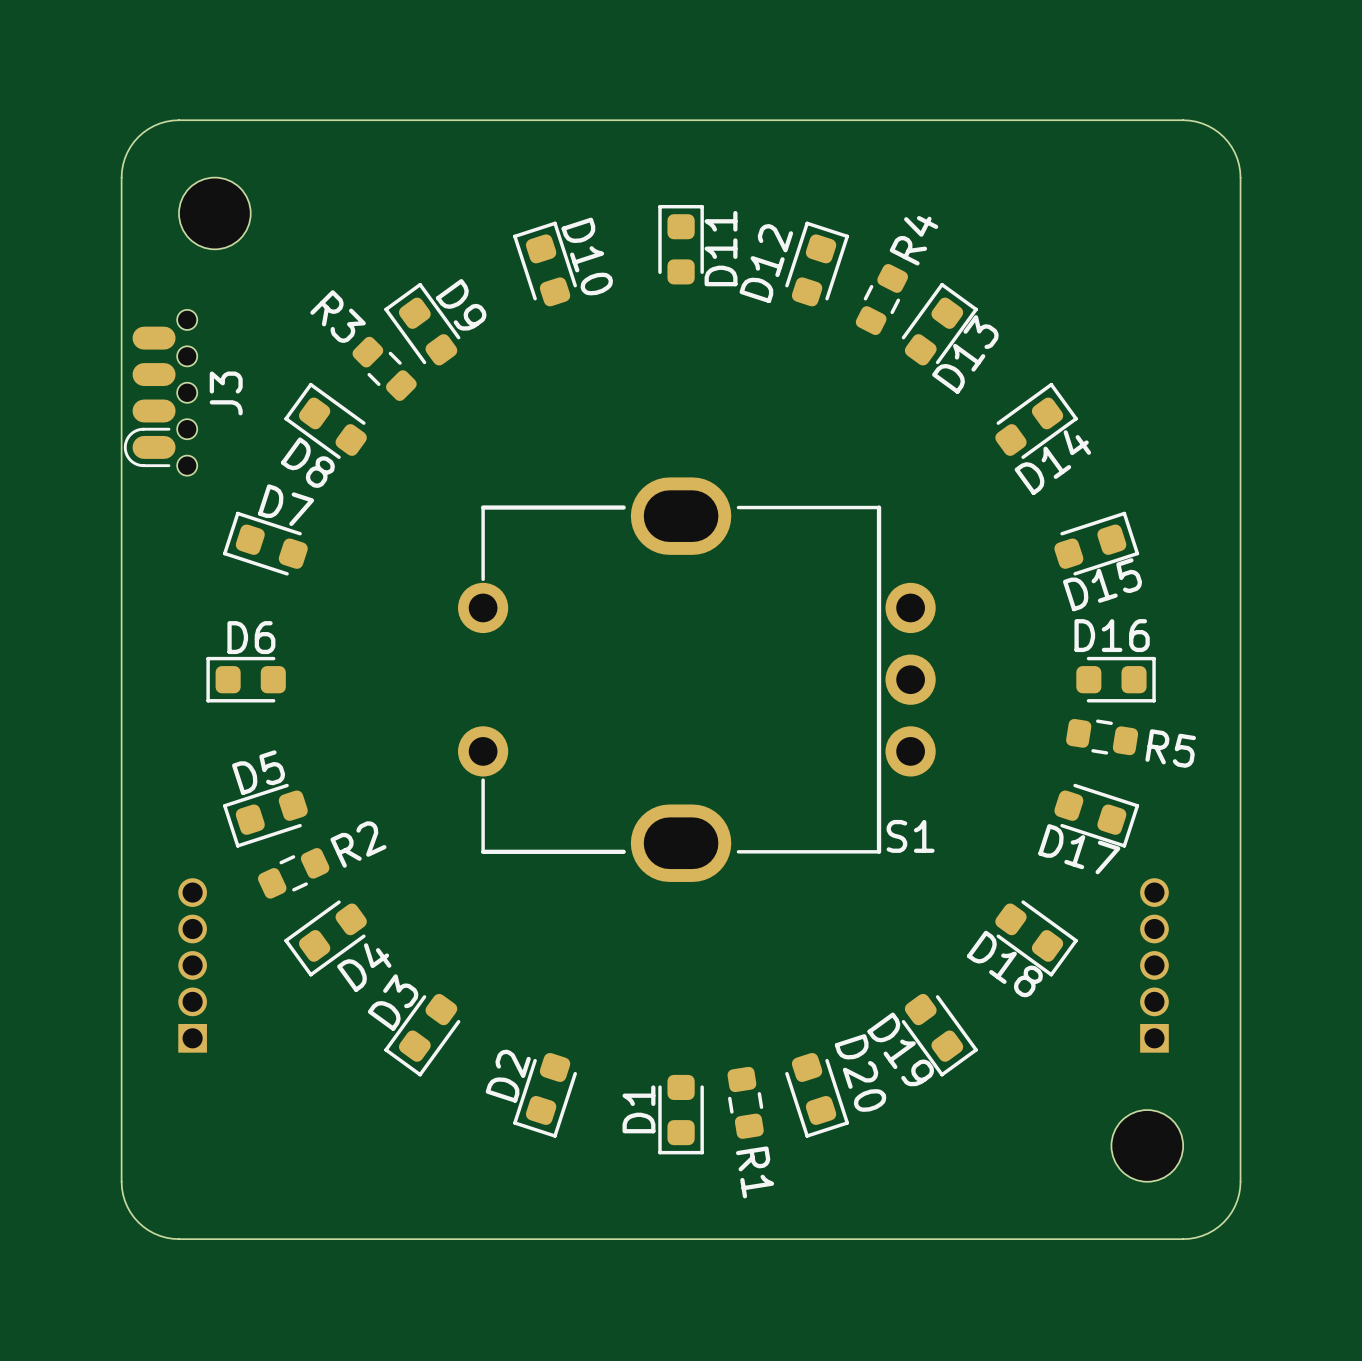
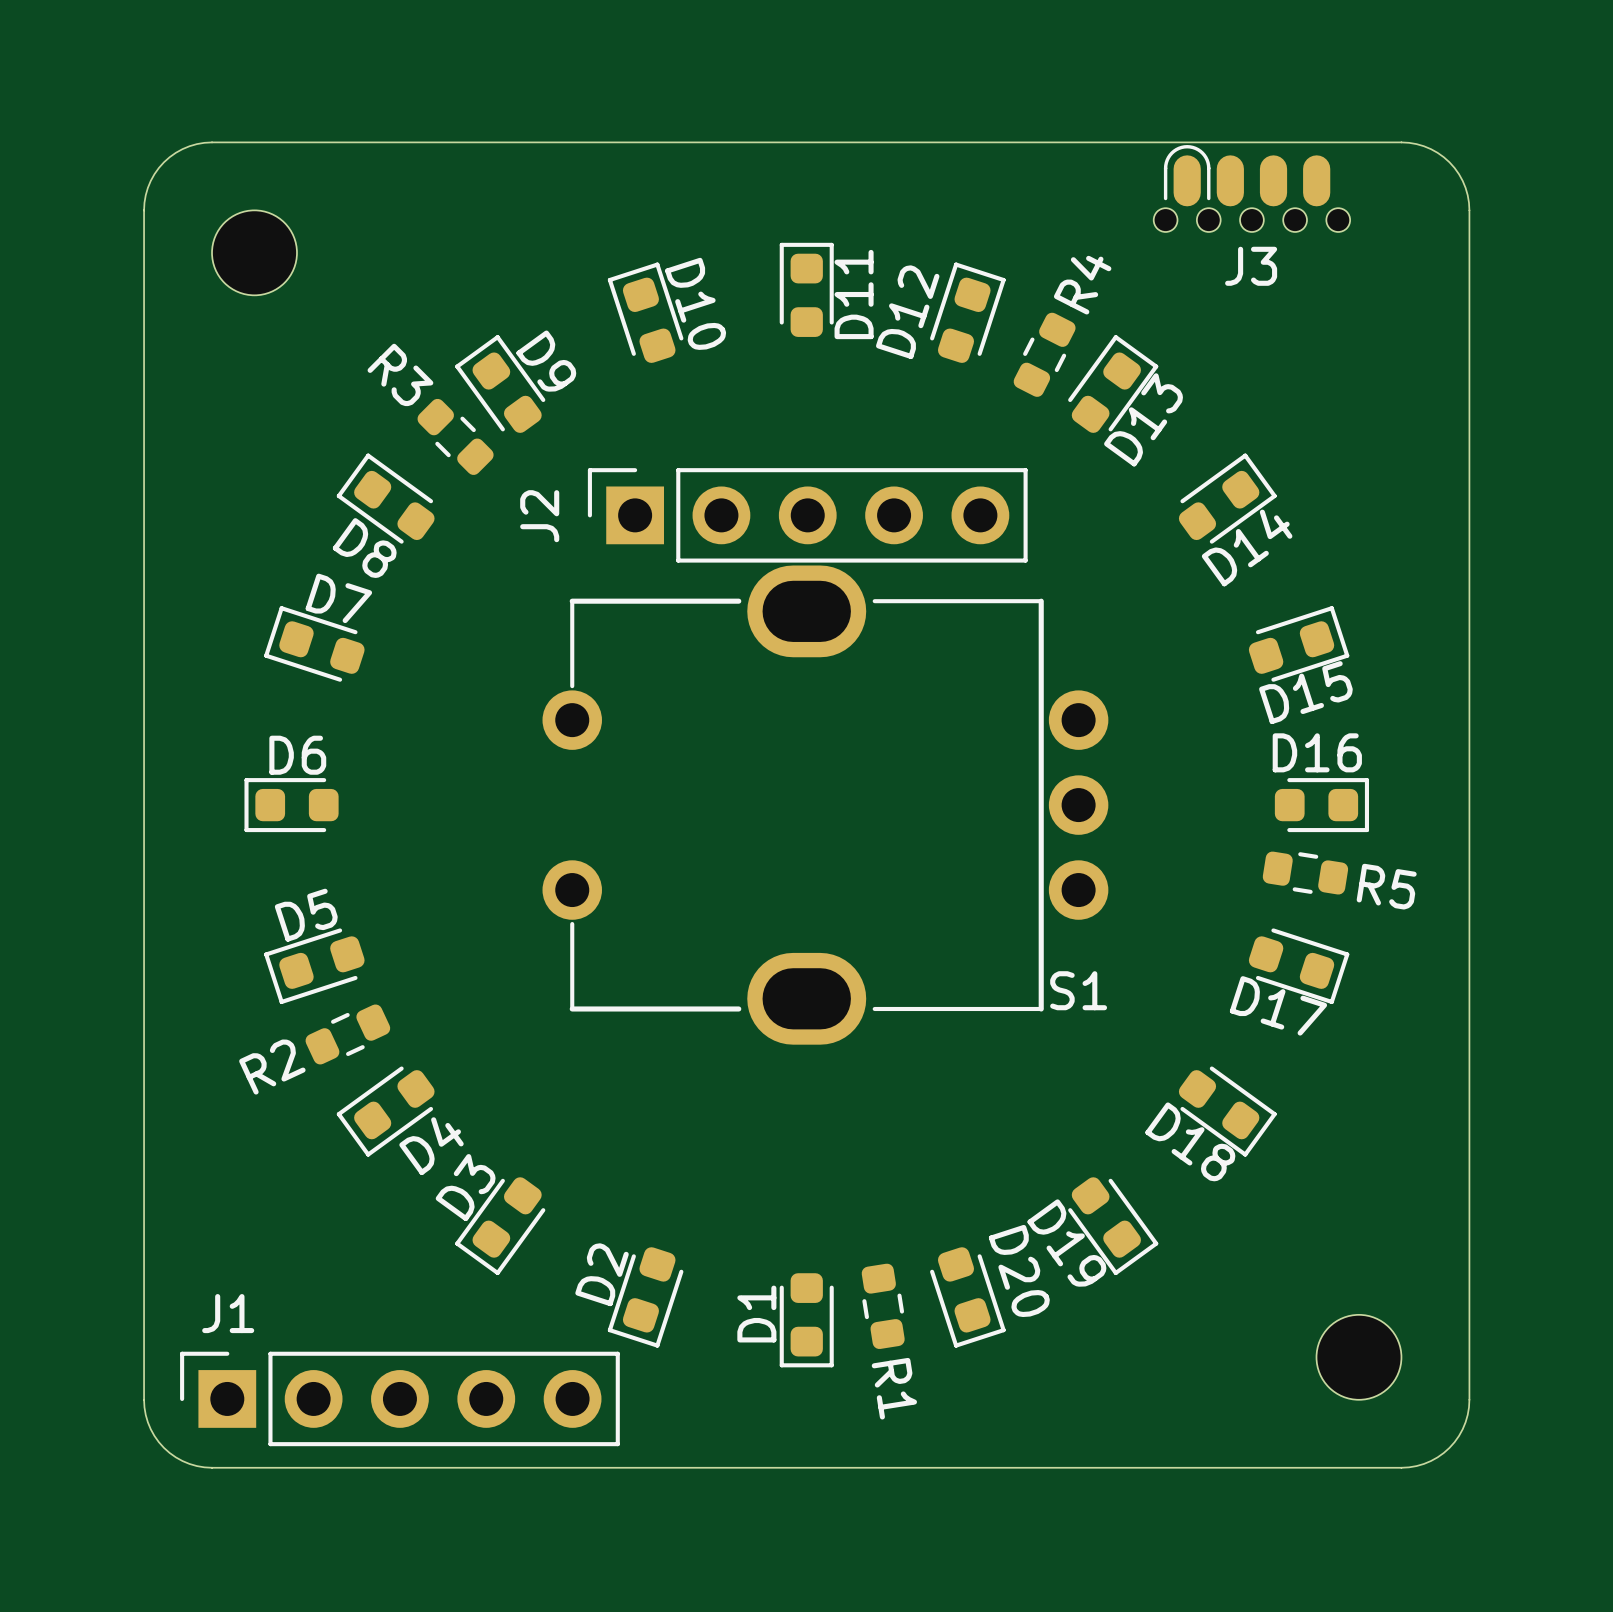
J3 rotation: 0° (160, 392) -> 90° clockwise (1251, 188)
J3 position: (160, 392) -> (1251, 188)
J2: none -> (807, 515)
R2 name position: R2 (358, 844) -> R2 (272, 1067)
part: (192, 965) -> none
part: (1154, 965) -> none
J1: none -> (399, 1398)

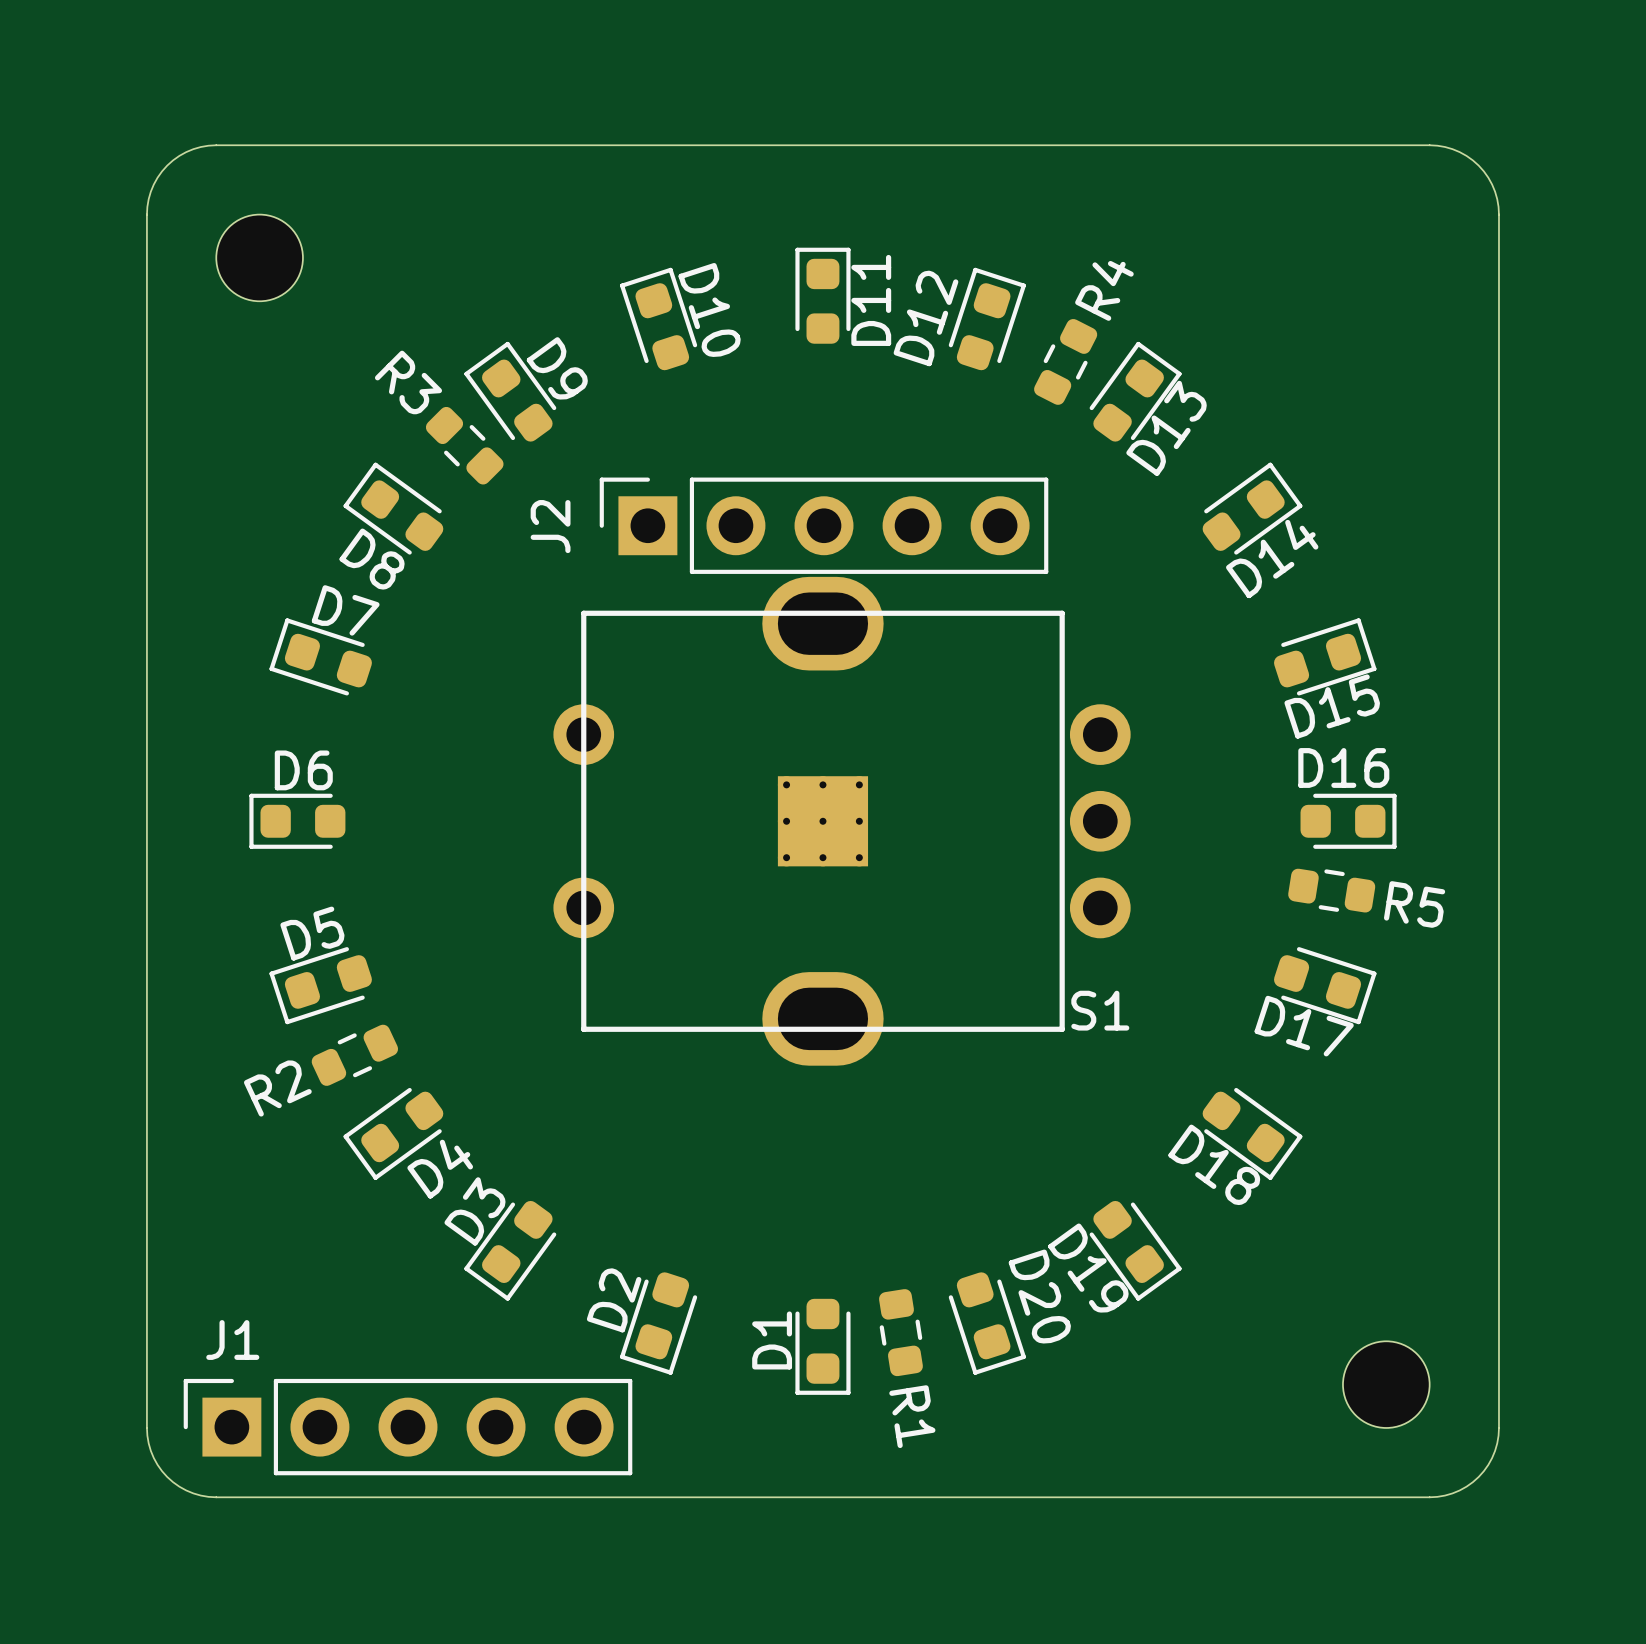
J3: (1251, 188) -> none
S1 footprint: [542, 565, 1109, 1045] -> [553, 576, 1131, 1066]
part: none -> (822, 821)

